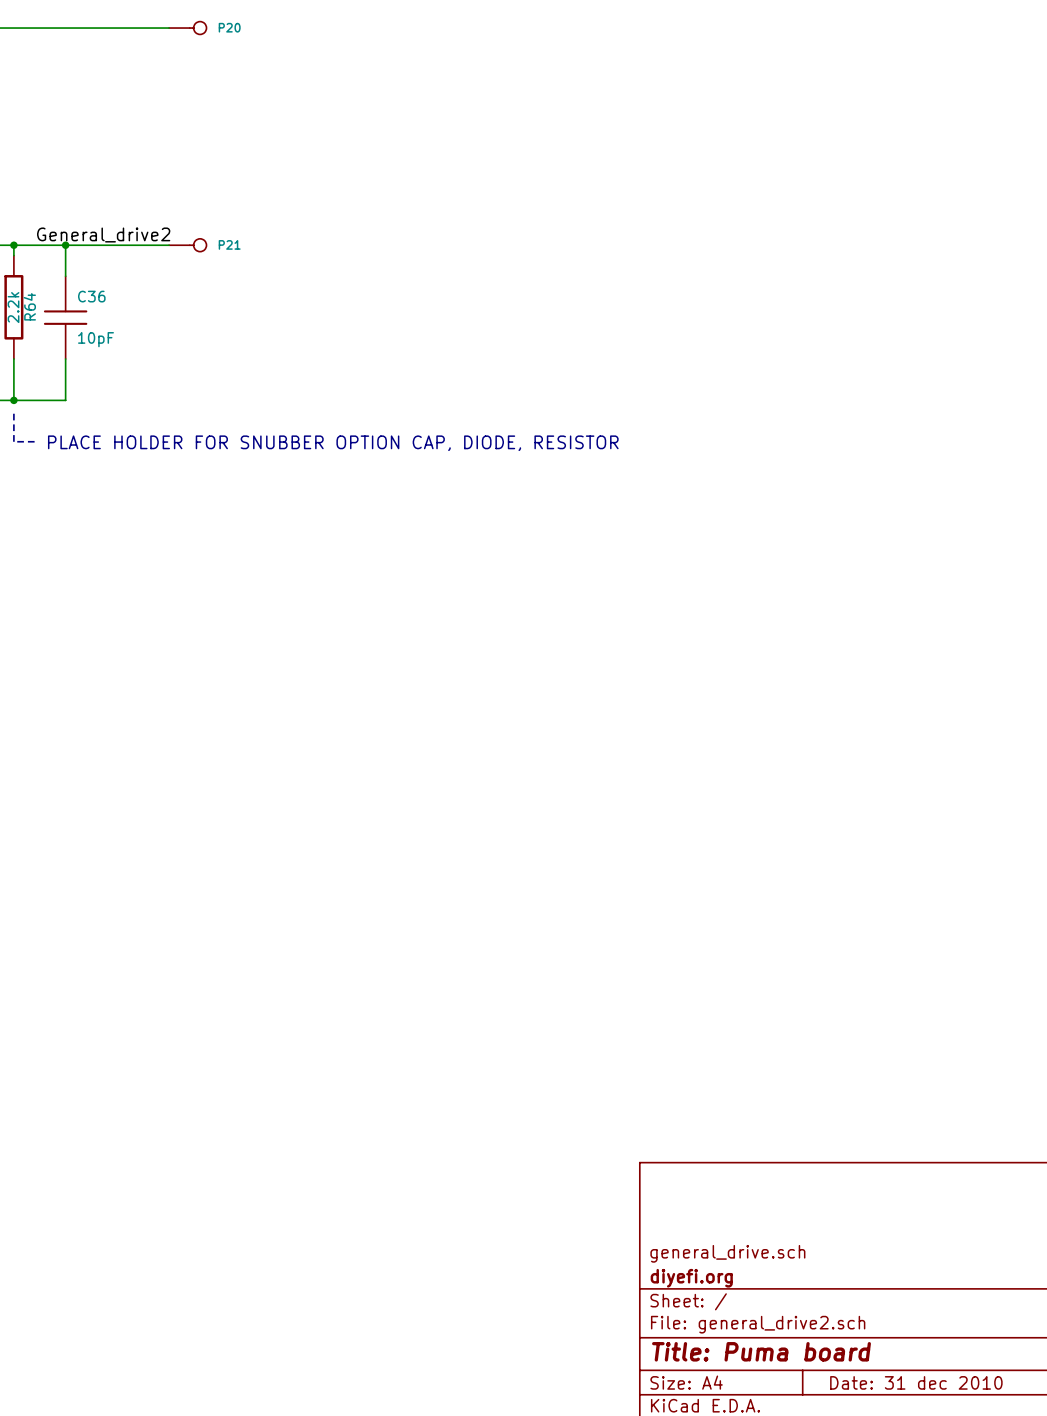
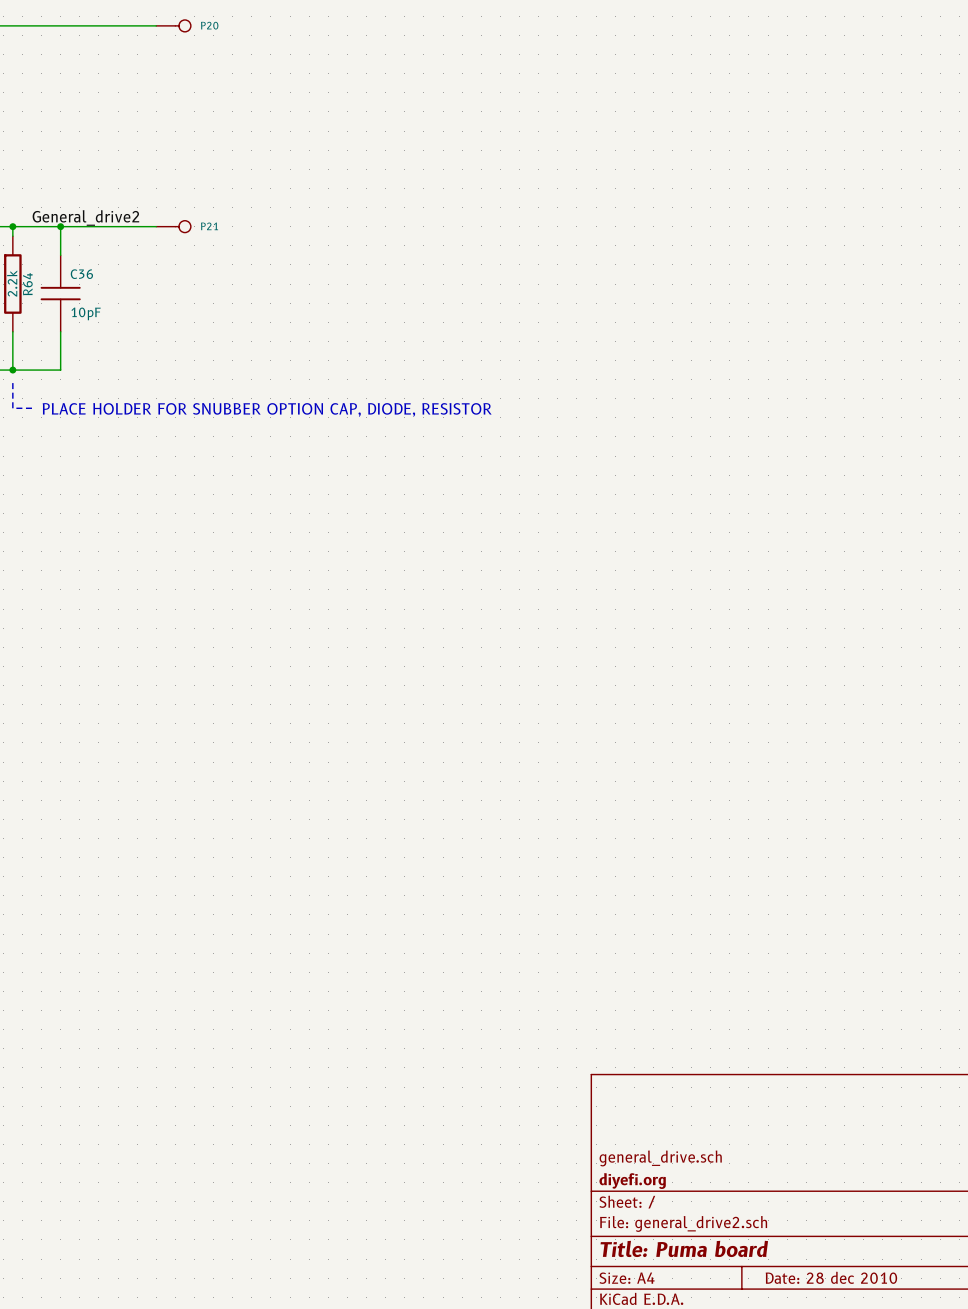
title block: Date: 31 dec 2010 (916, 1382) -> Date: 28 dec 2010 (831, 1277)

